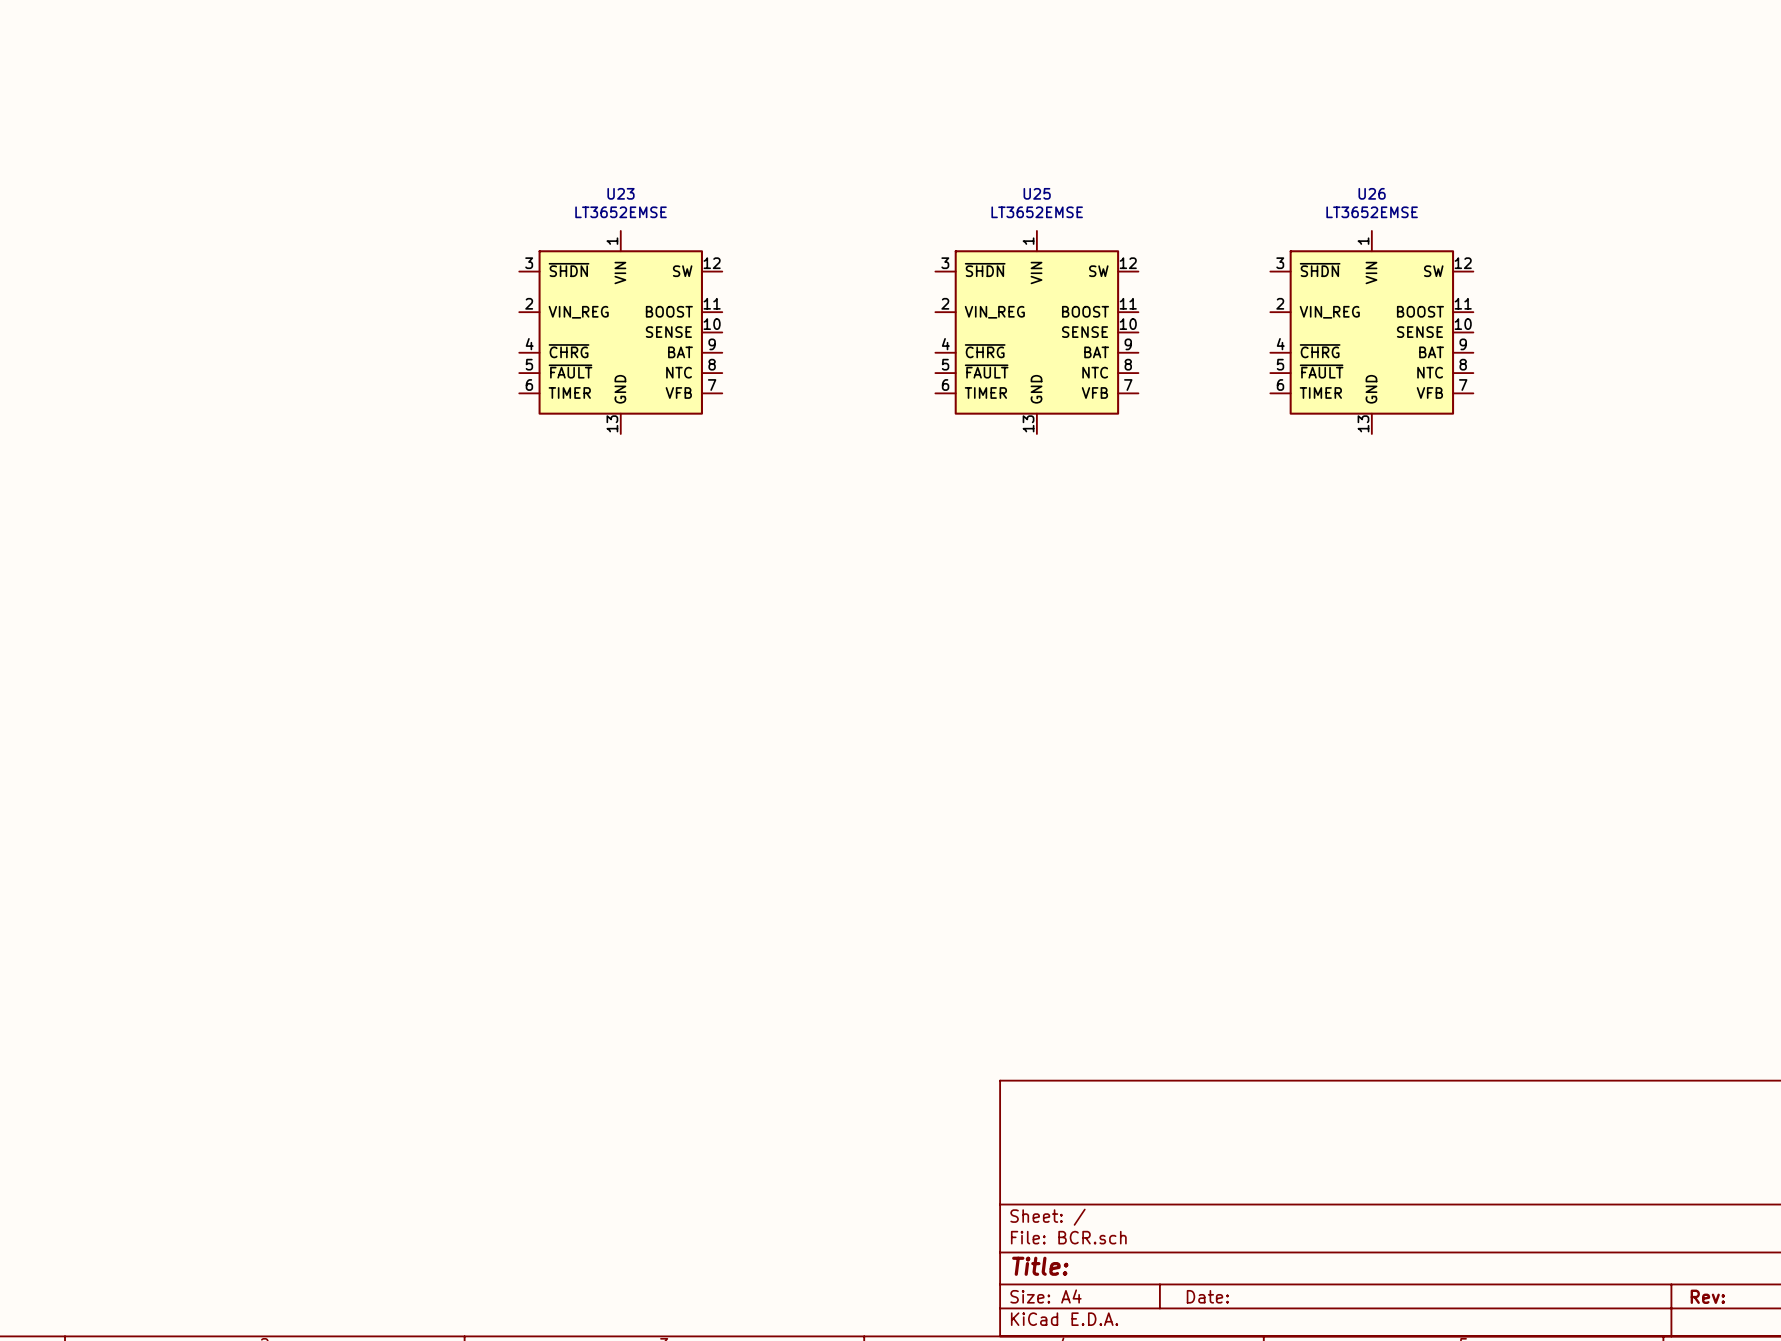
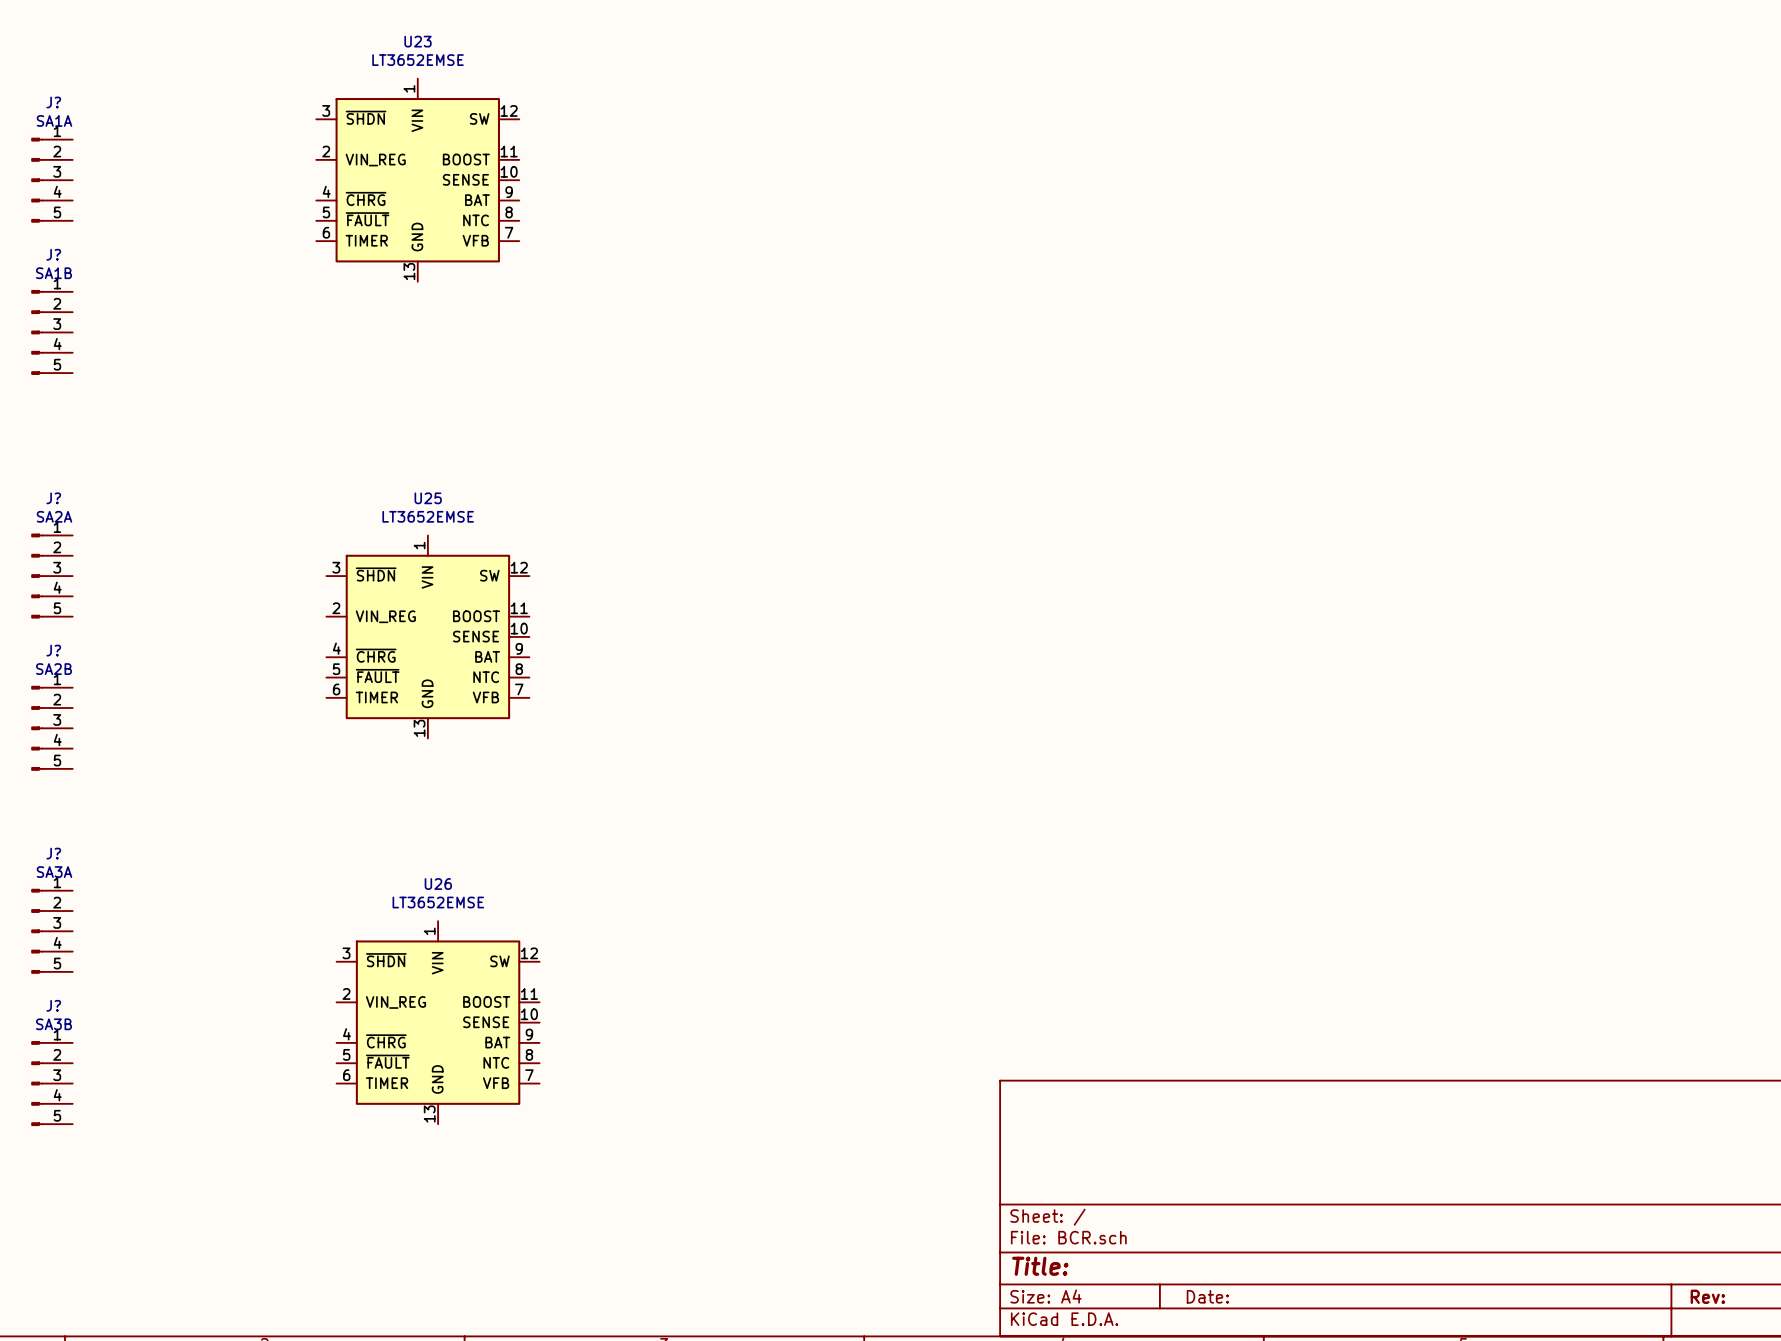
J?: none -> SA1A (52, 180)
J?: none -> SA1B (52, 332)
U23 position: (620, 332) -> (417, 180)
U25 position: (1036, 332) -> (427, 636)
U26 position: (1371, 332) -> (438, 1022)
J?: none -> SA2A (52, 576)
J?: none -> SA2B (52, 728)
J?: none -> SA3A (52, 931)
J?: none -> SA3B (52, 1083)

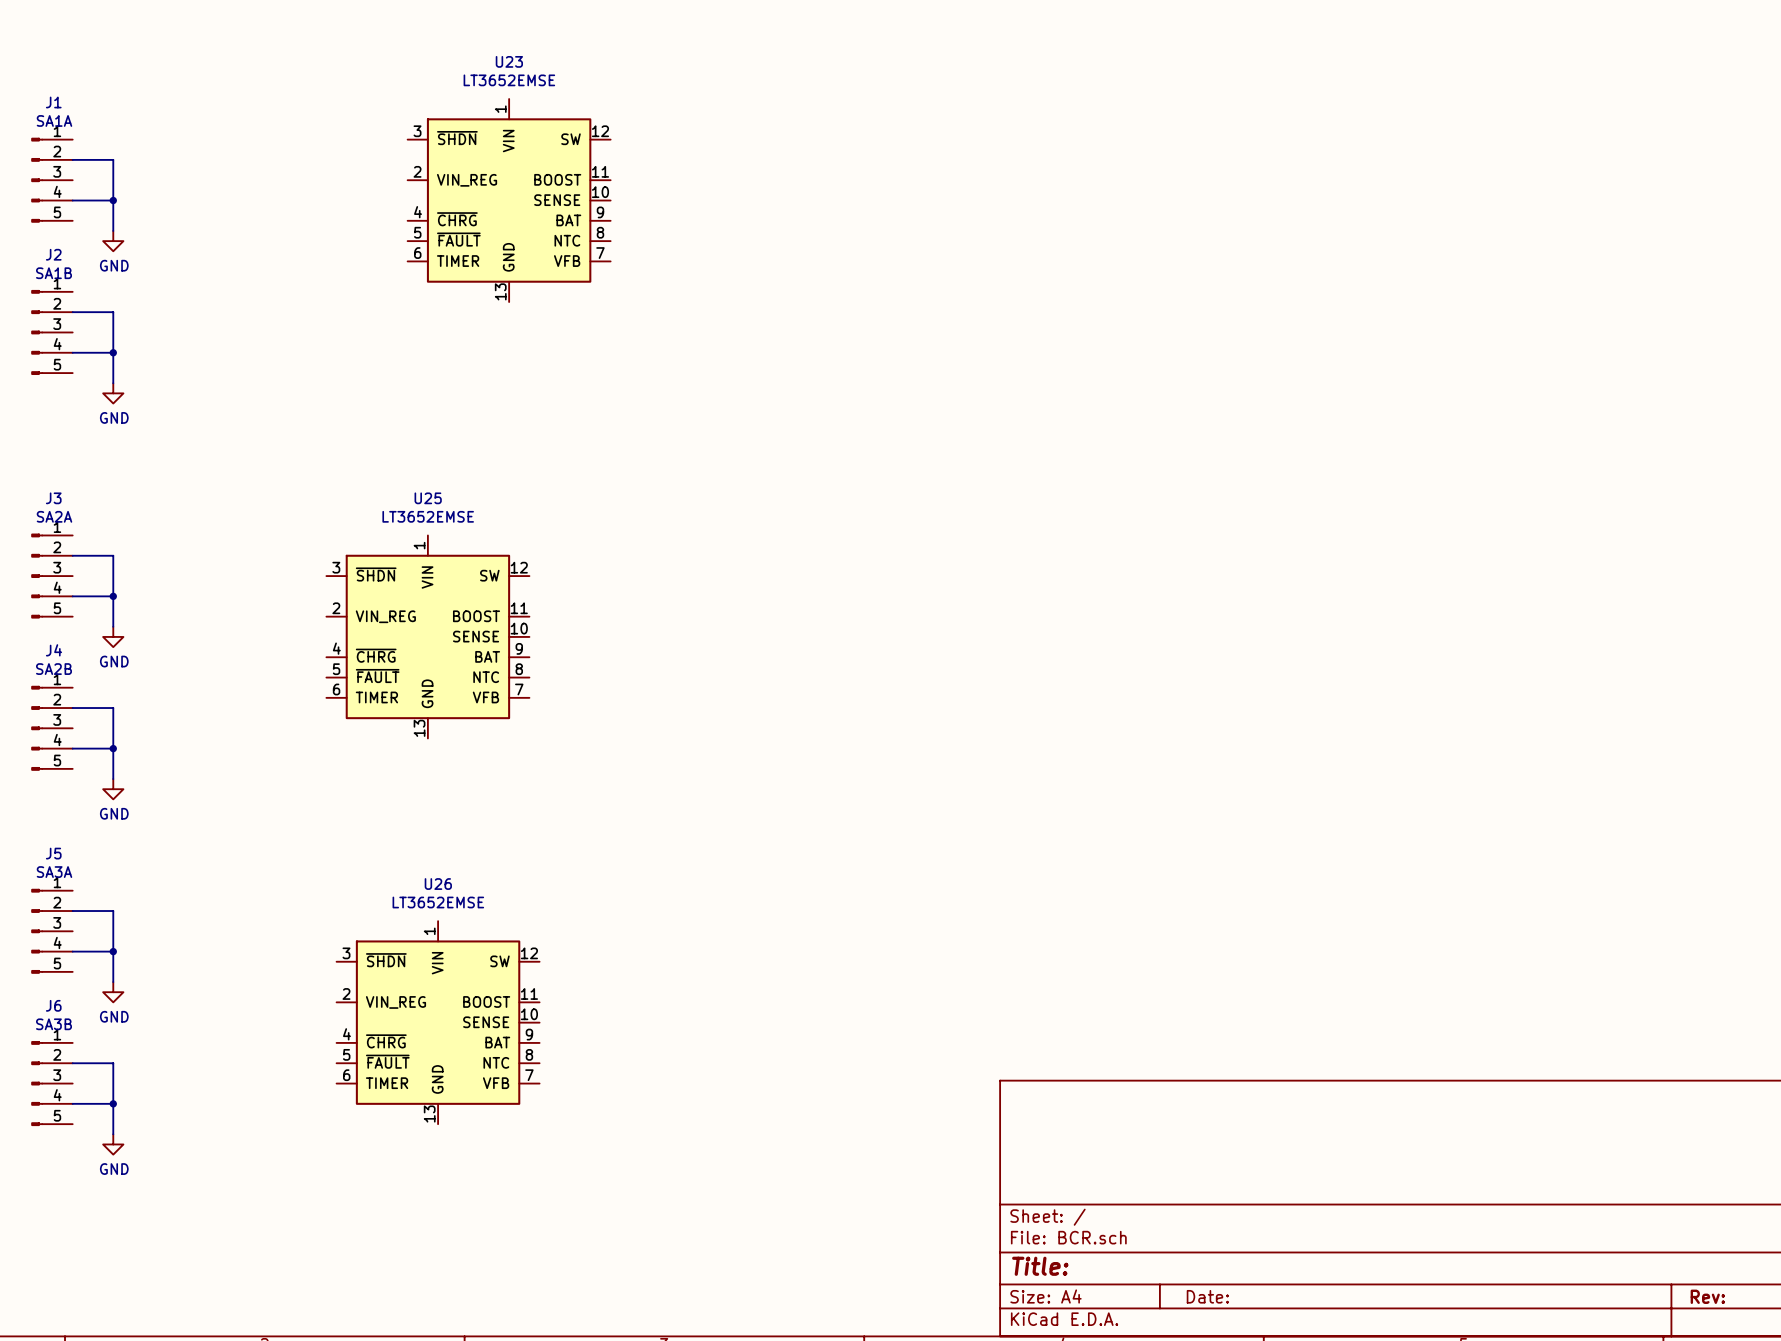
J? name: J? (53, 102) -> J1 (53, 102)
wire: none -> (72, 159) (113, 159) (113, 230)
U23 position: (417, 180) -> (509, 200)
wire: none -> (72, 200) (113, 200)
junction: none -> (113, 200)
power symbol: none -> GND (113, 241)
J? name: J? (53, 254) -> J2 (53, 254)
wire: none -> (72, 312) (113, 312) (113, 383)
wire: none -> (72, 352) (113, 352)
junction: none -> (113, 352)
power symbol: none -> GND (113, 393)
J? name: J? (53, 498) -> J3 (53, 498)
wire: none -> (72, 555) (113, 555) (113, 626)
wire: none -> (72, 596) (113, 596)
junction: none -> (113, 596)
power symbol: none -> GND (113, 636)
J? name: J? (53, 650) -> J4 (54, 650)
wire: none -> (72, 708) (113, 708) (113, 779)
wire: none -> (72, 748) (113, 748)
junction: none -> (113, 748)
power symbol: none -> GND (113, 789)
J? name: J? (53, 853) -> J5 (53, 853)
wire: none -> (72, 911) (113, 911) (113, 982)
wire: none -> (72, 951) (113, 951)
junction: none -> (113, 951)
power symbol: none -> GND (113, 992)
J? name: J? (53, 1005) -> J6 (53, 1005)
wire: none -> (72, 1063) (113, 1063) (113, 1134)
wire: none -> (72, 1103) (113, 1103)
junction: none -> (113, 1103)
power symbol: none -> GND (113, 1144)

